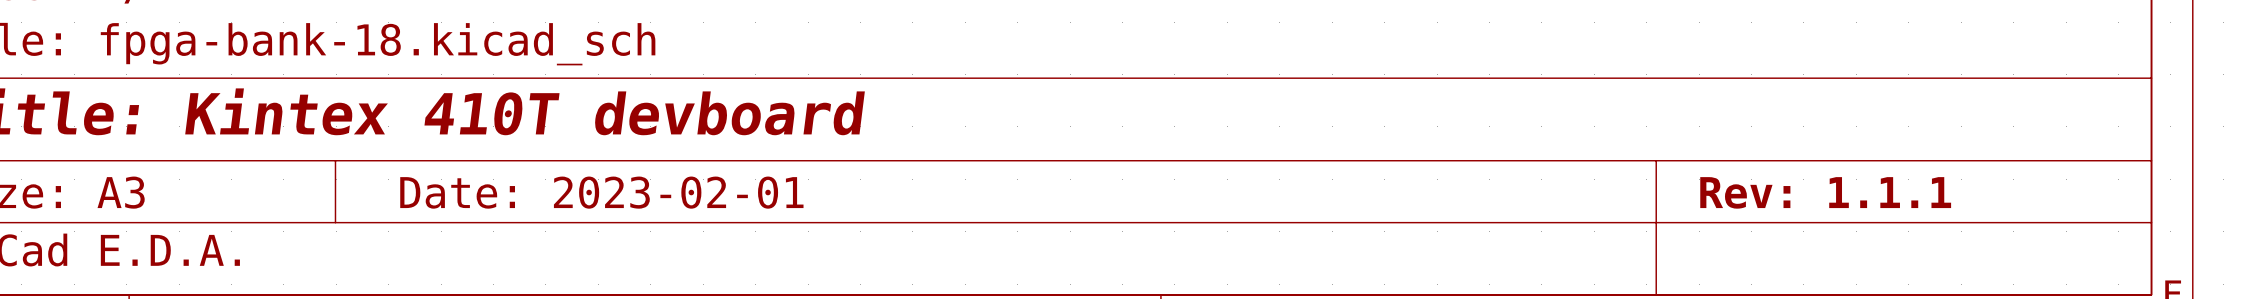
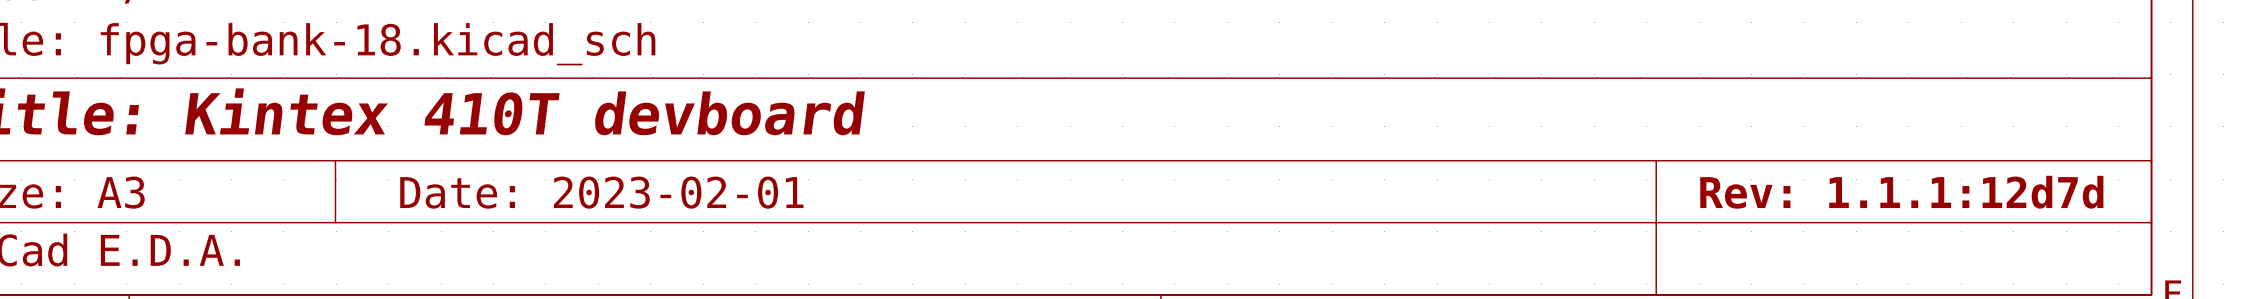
title block: Rev: 1.1.1 (1825, 192) -> Rev: 1.1.1:12d7d (1901, 192)

